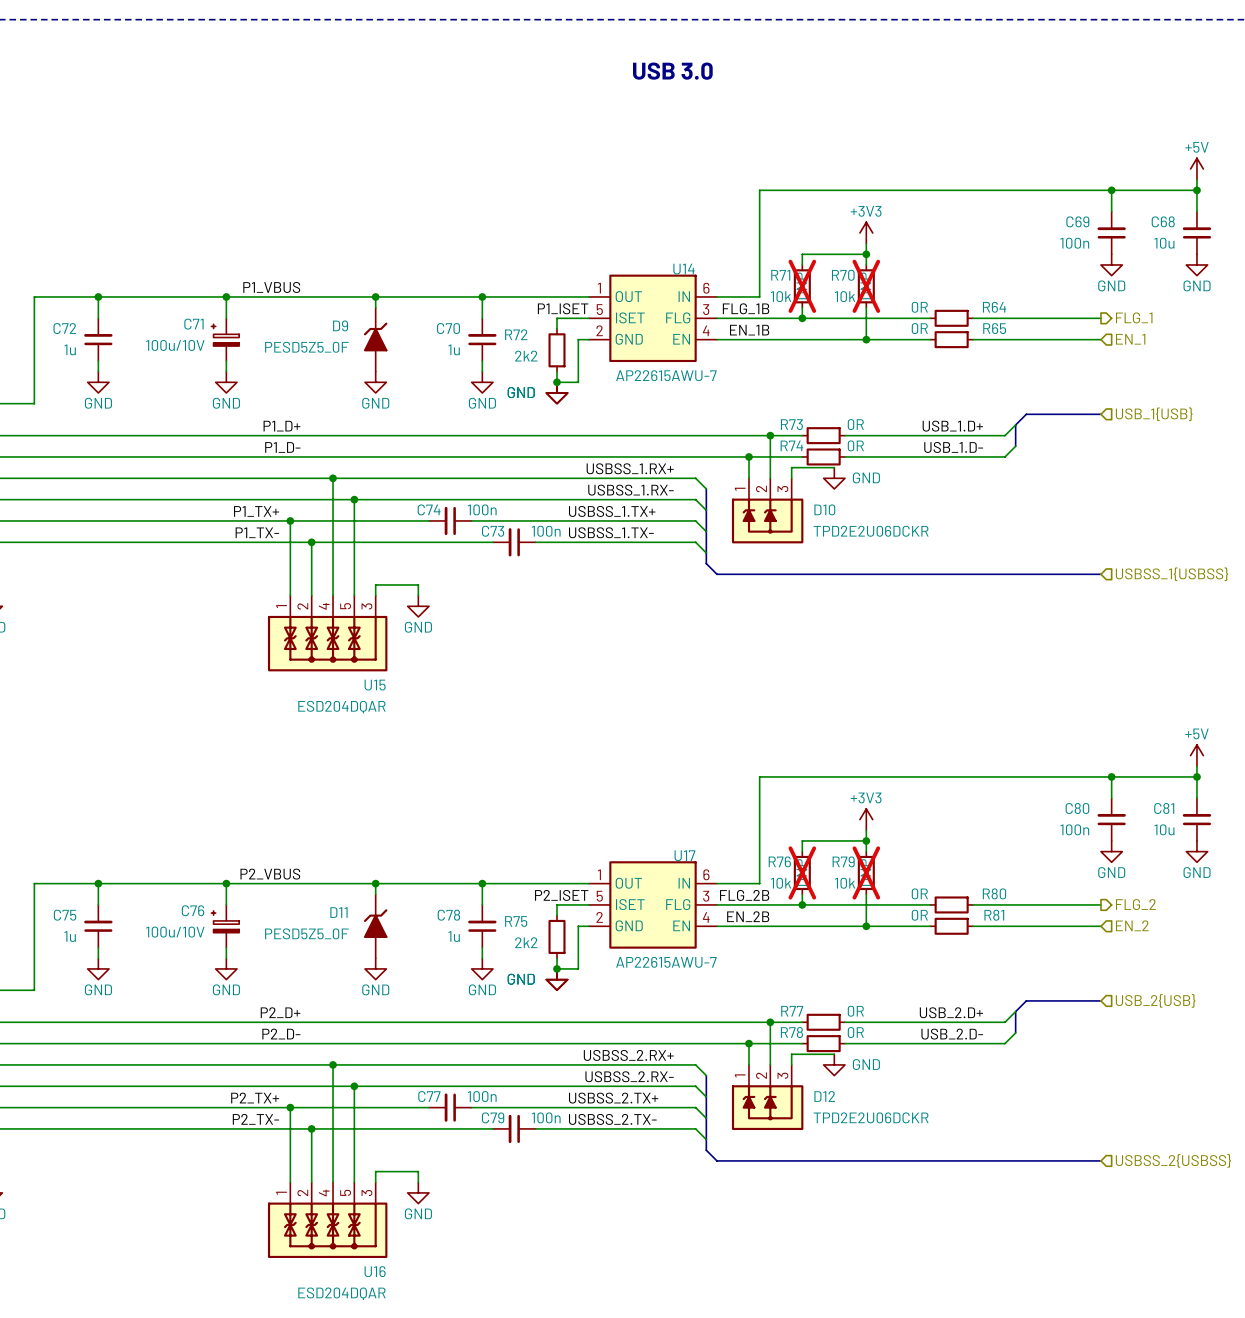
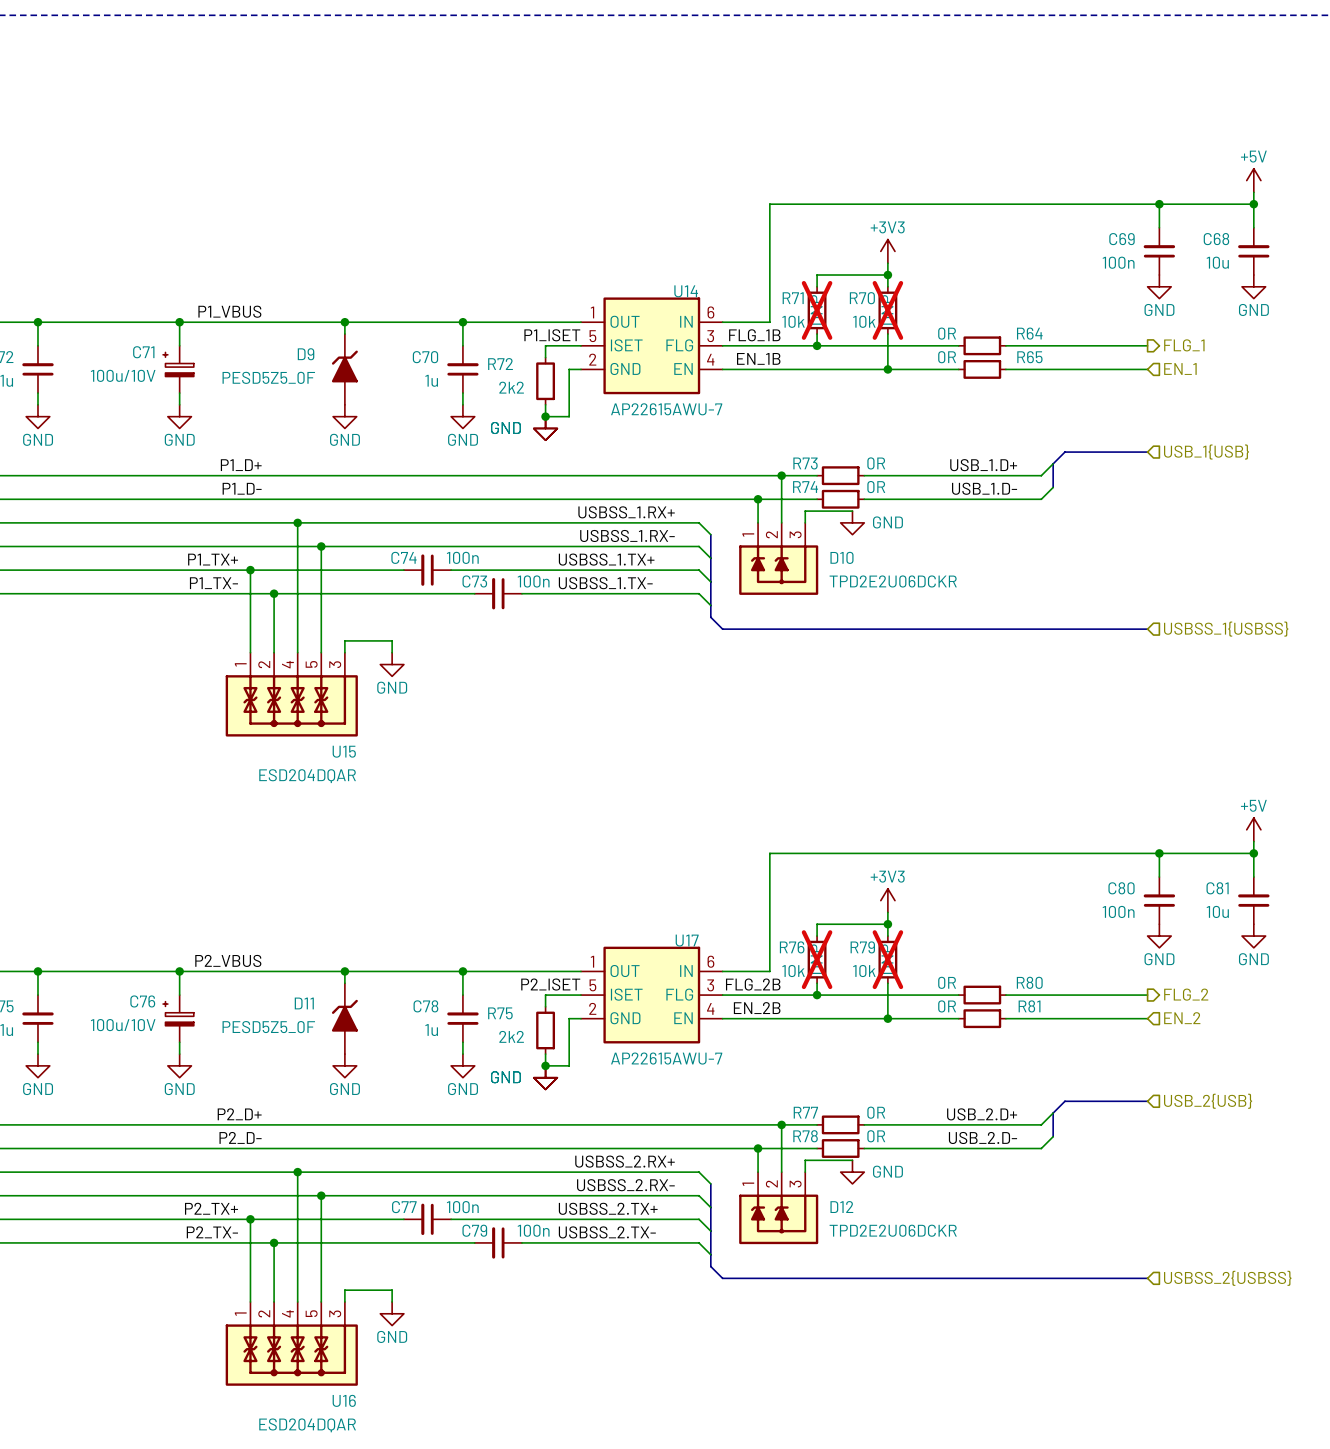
text: USB 3.0 (672, 71) -> none

